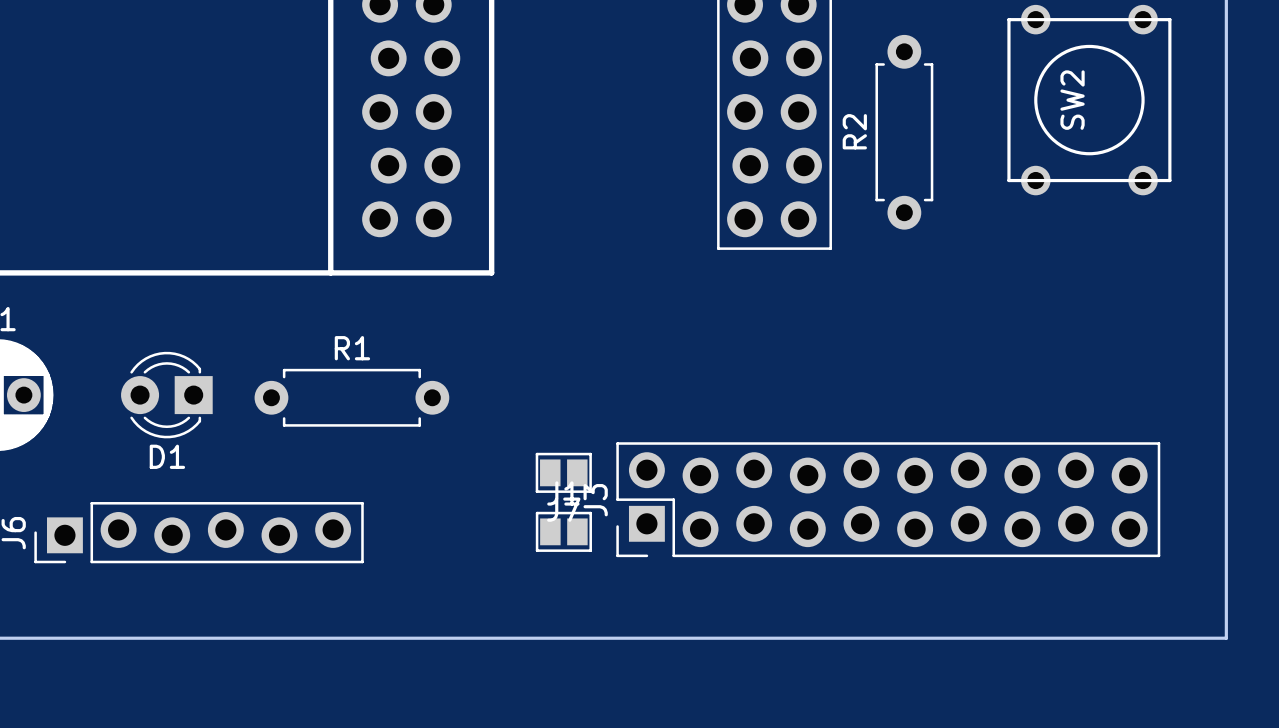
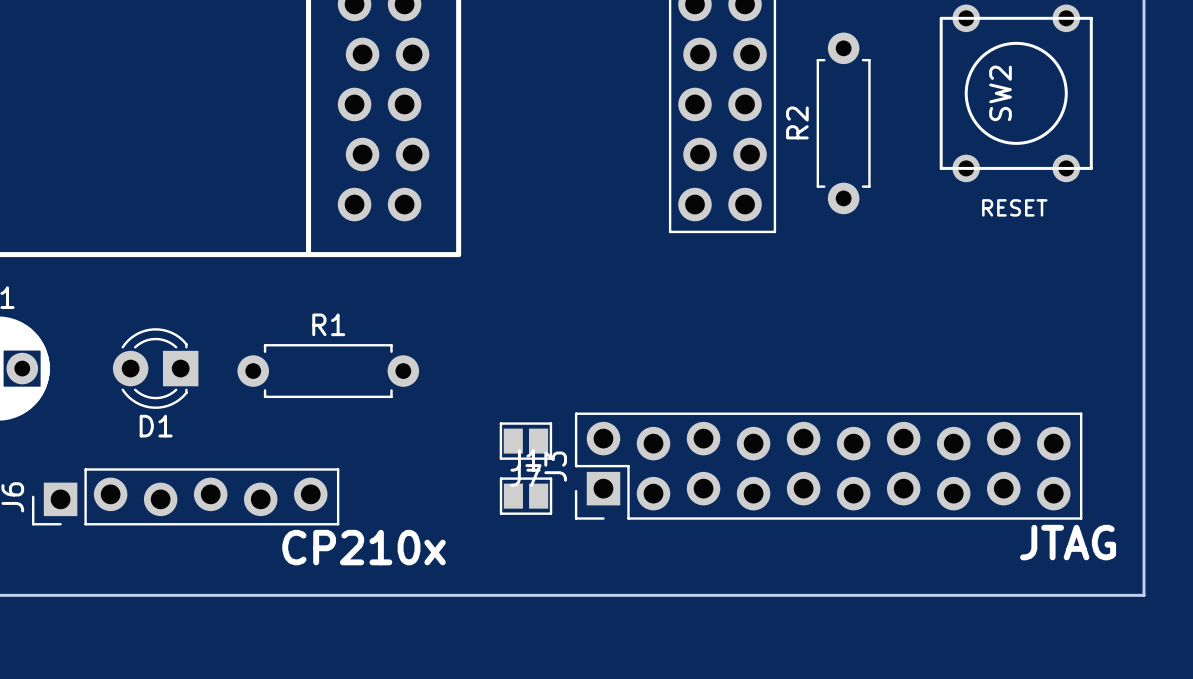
text: none -> RESET (1014, 207)
text: none -> JTAG (1068, 542)
text: none -> CP210x (364, 547)

